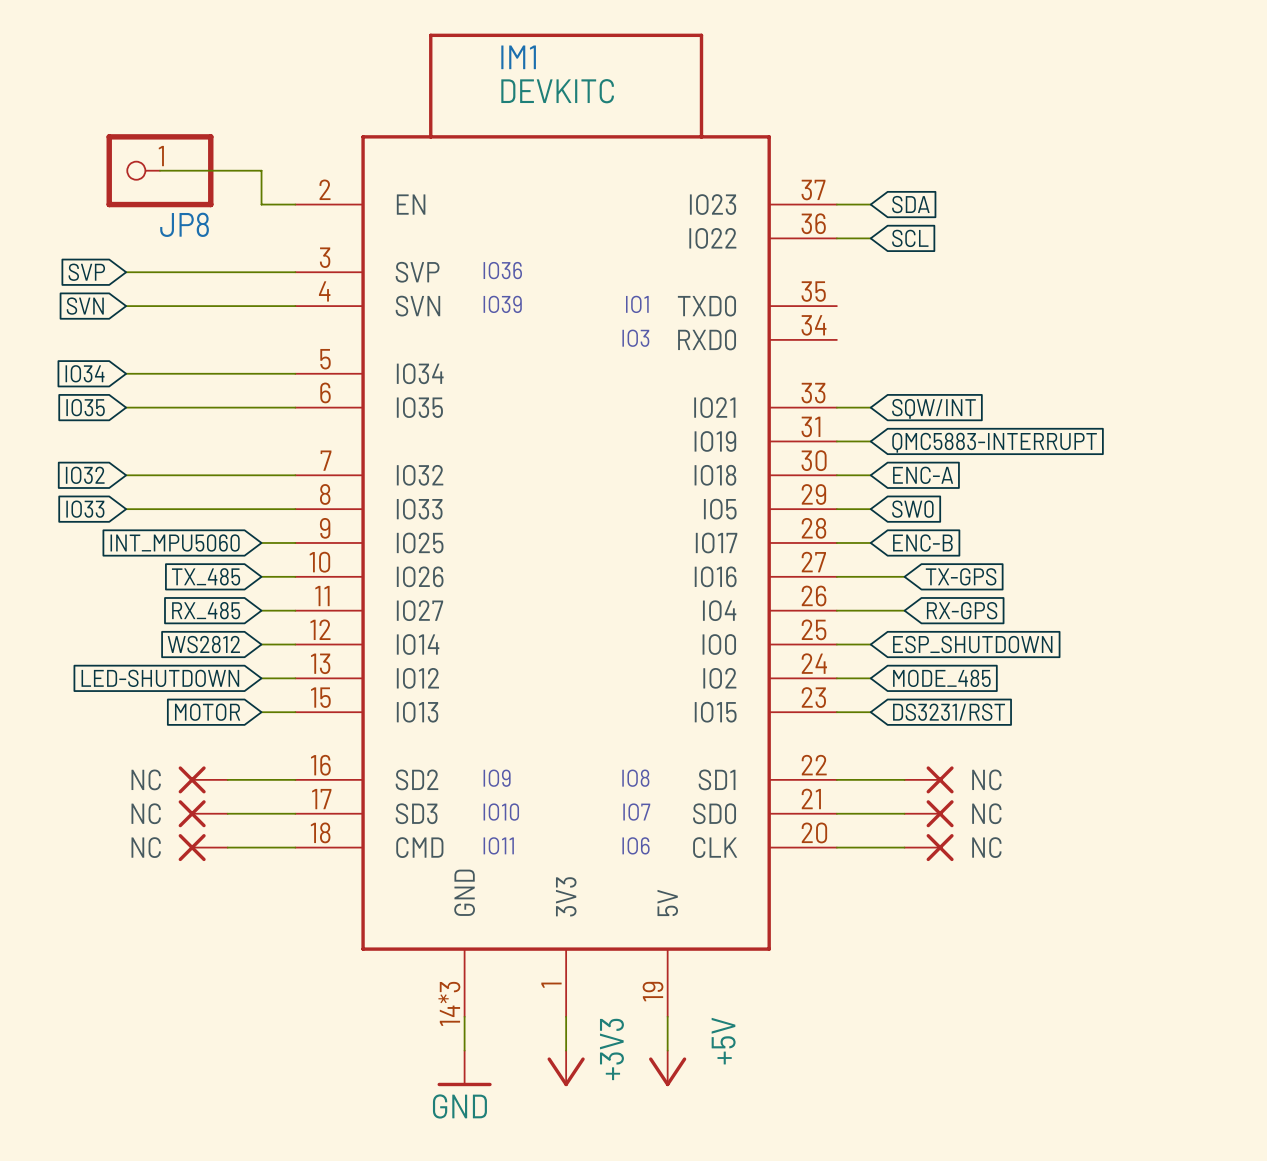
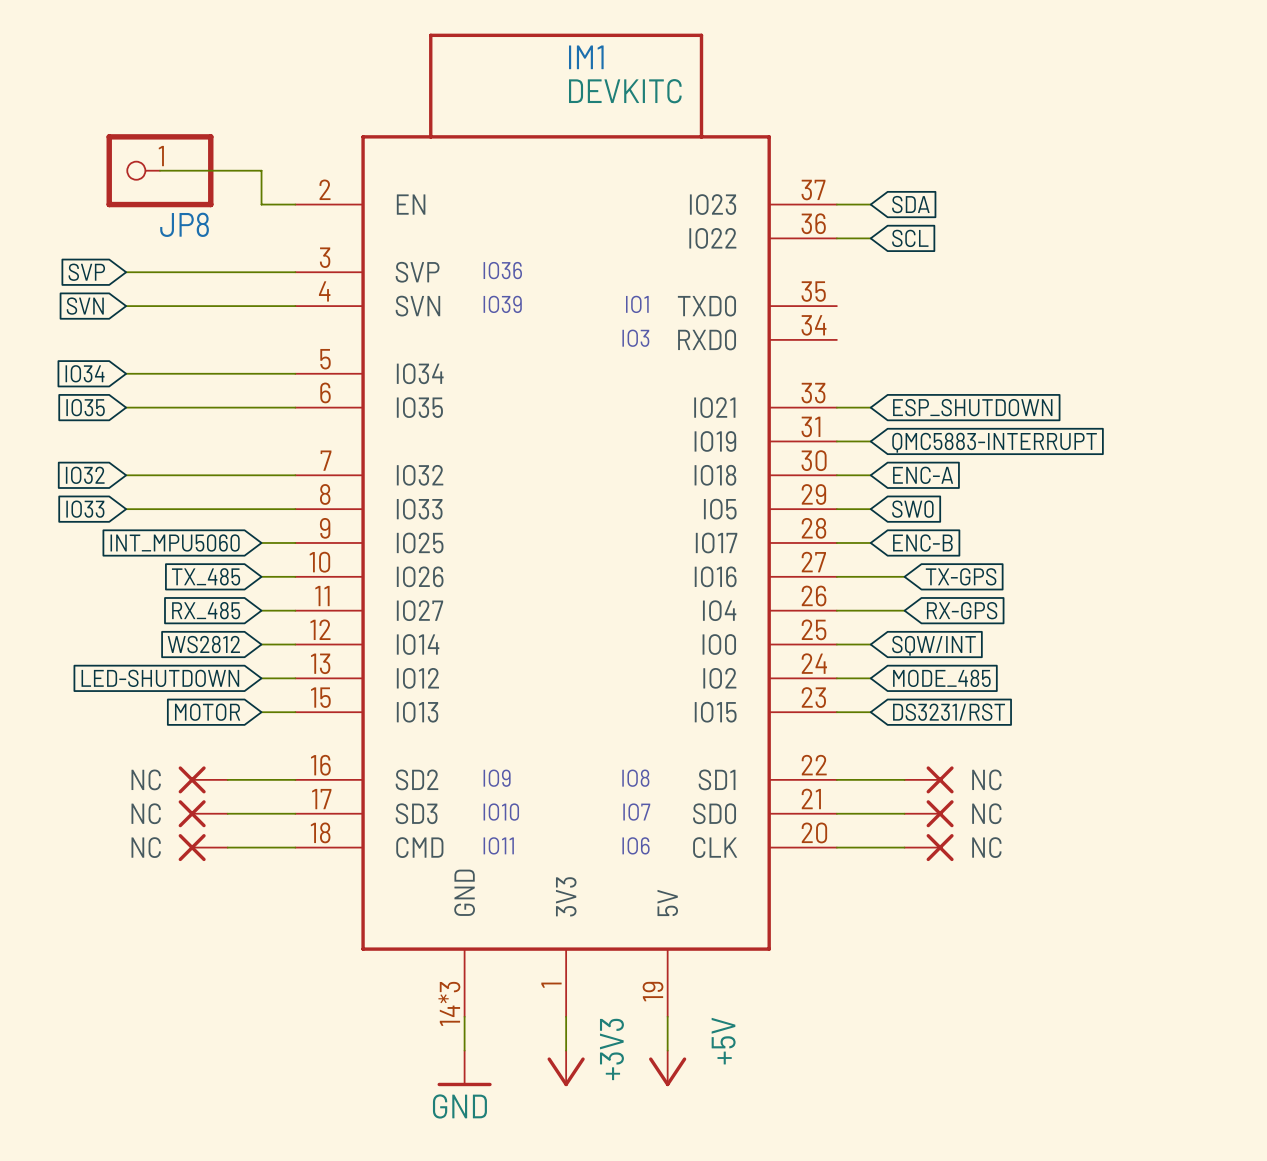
IM1 name position: IM1 (518, 57) -> IM1 (586, 57)
IM1 value position: DEVKITC (557, 91) -> DEVKITC (625, 91)
global label: SQW/INT (934, 408) -> ESP_SHUTDOWN (972, 407)
global label: ESP_SHUTDOWN (972, 644) -> SQW/INT (934, 645)

